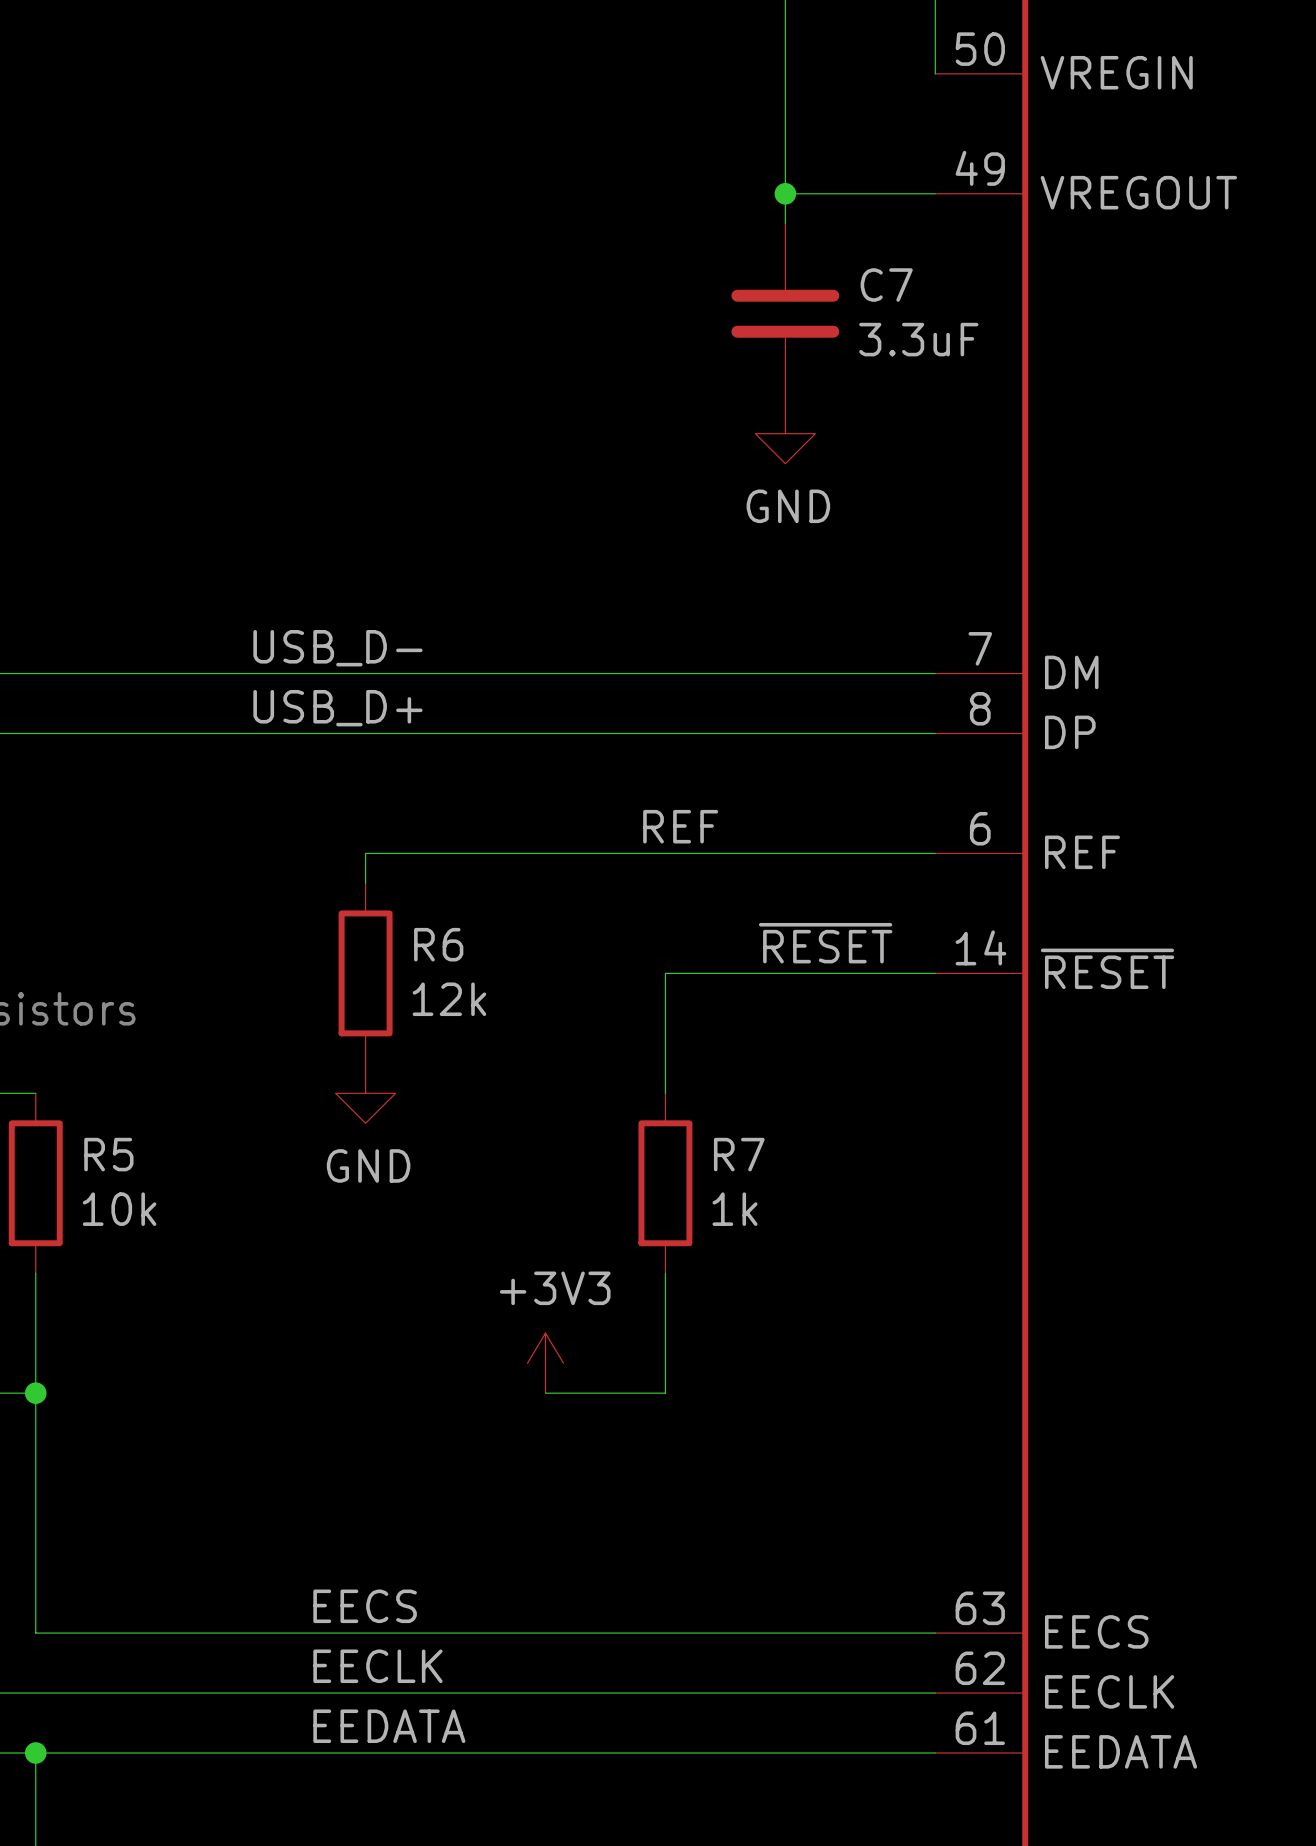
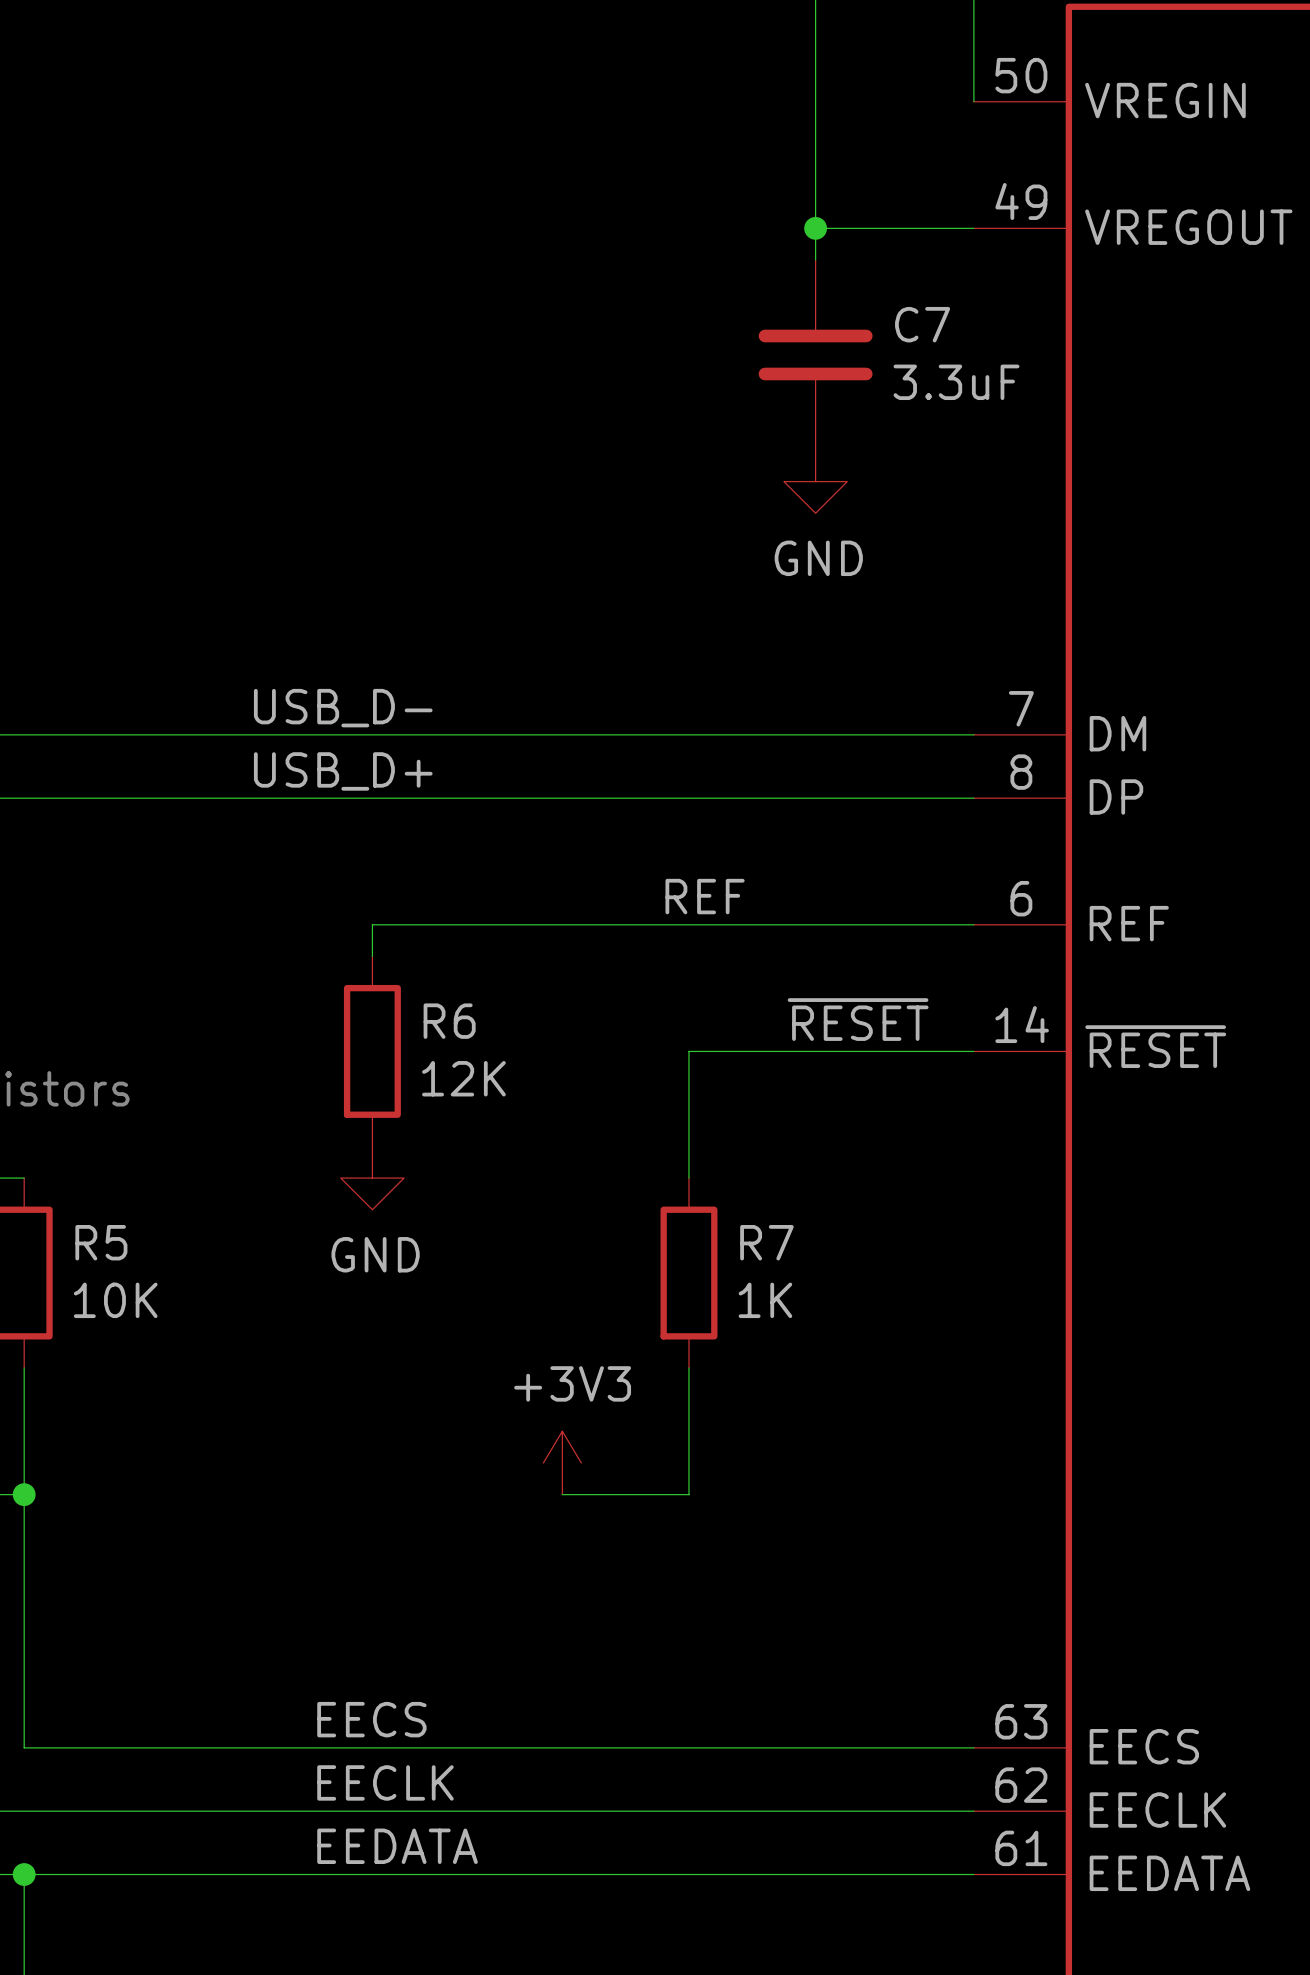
R6 value: 12k (449, 999) -> 12K (463, 1078)
R5 value: 10k (119, 1209) -> 10K (115, 1300)
R7 value: 1k (735, 1209) -> 1K (765, 1300)

